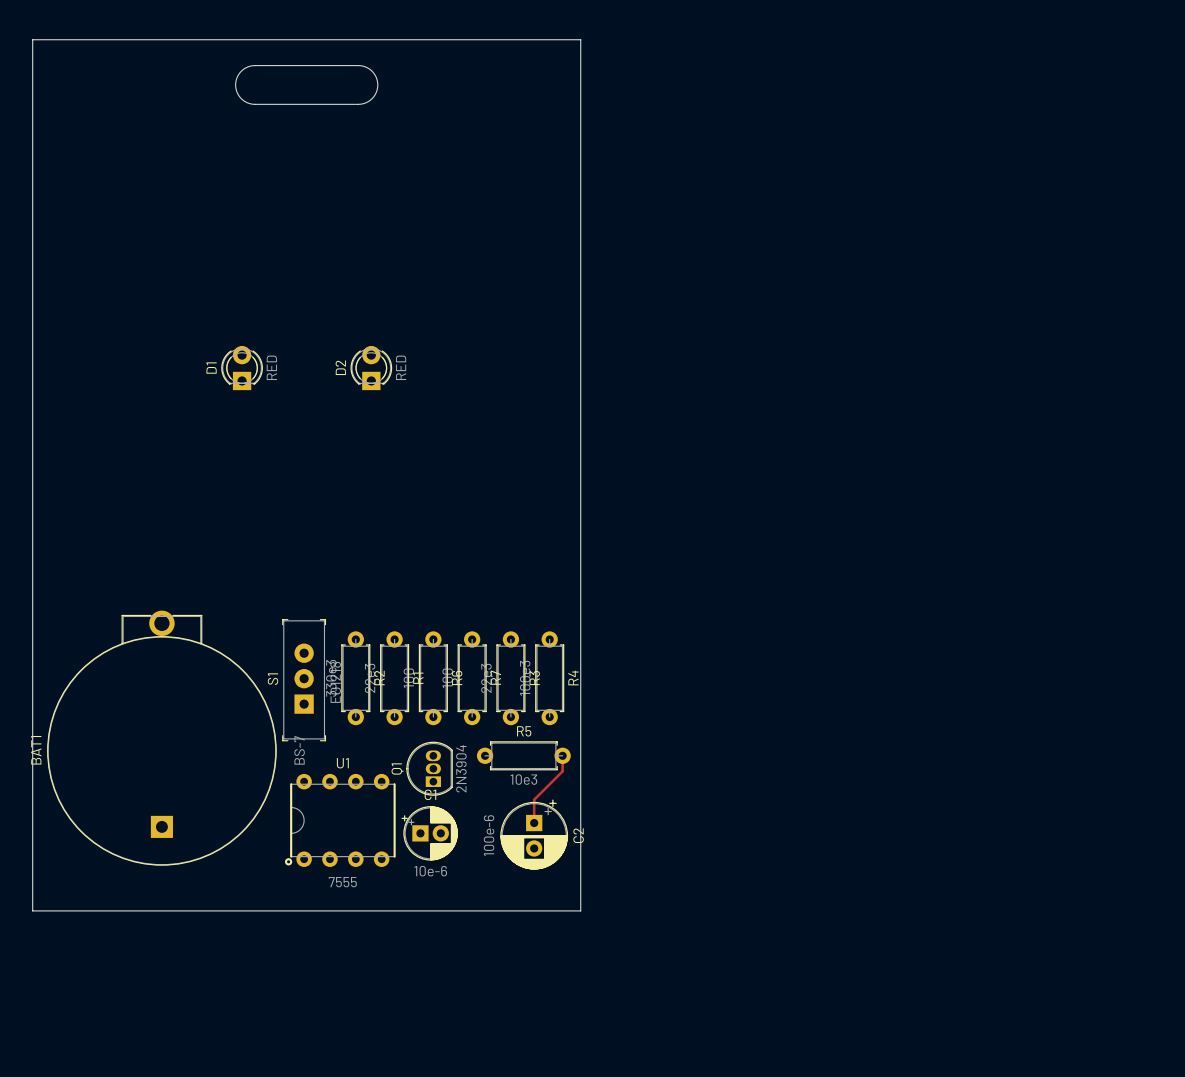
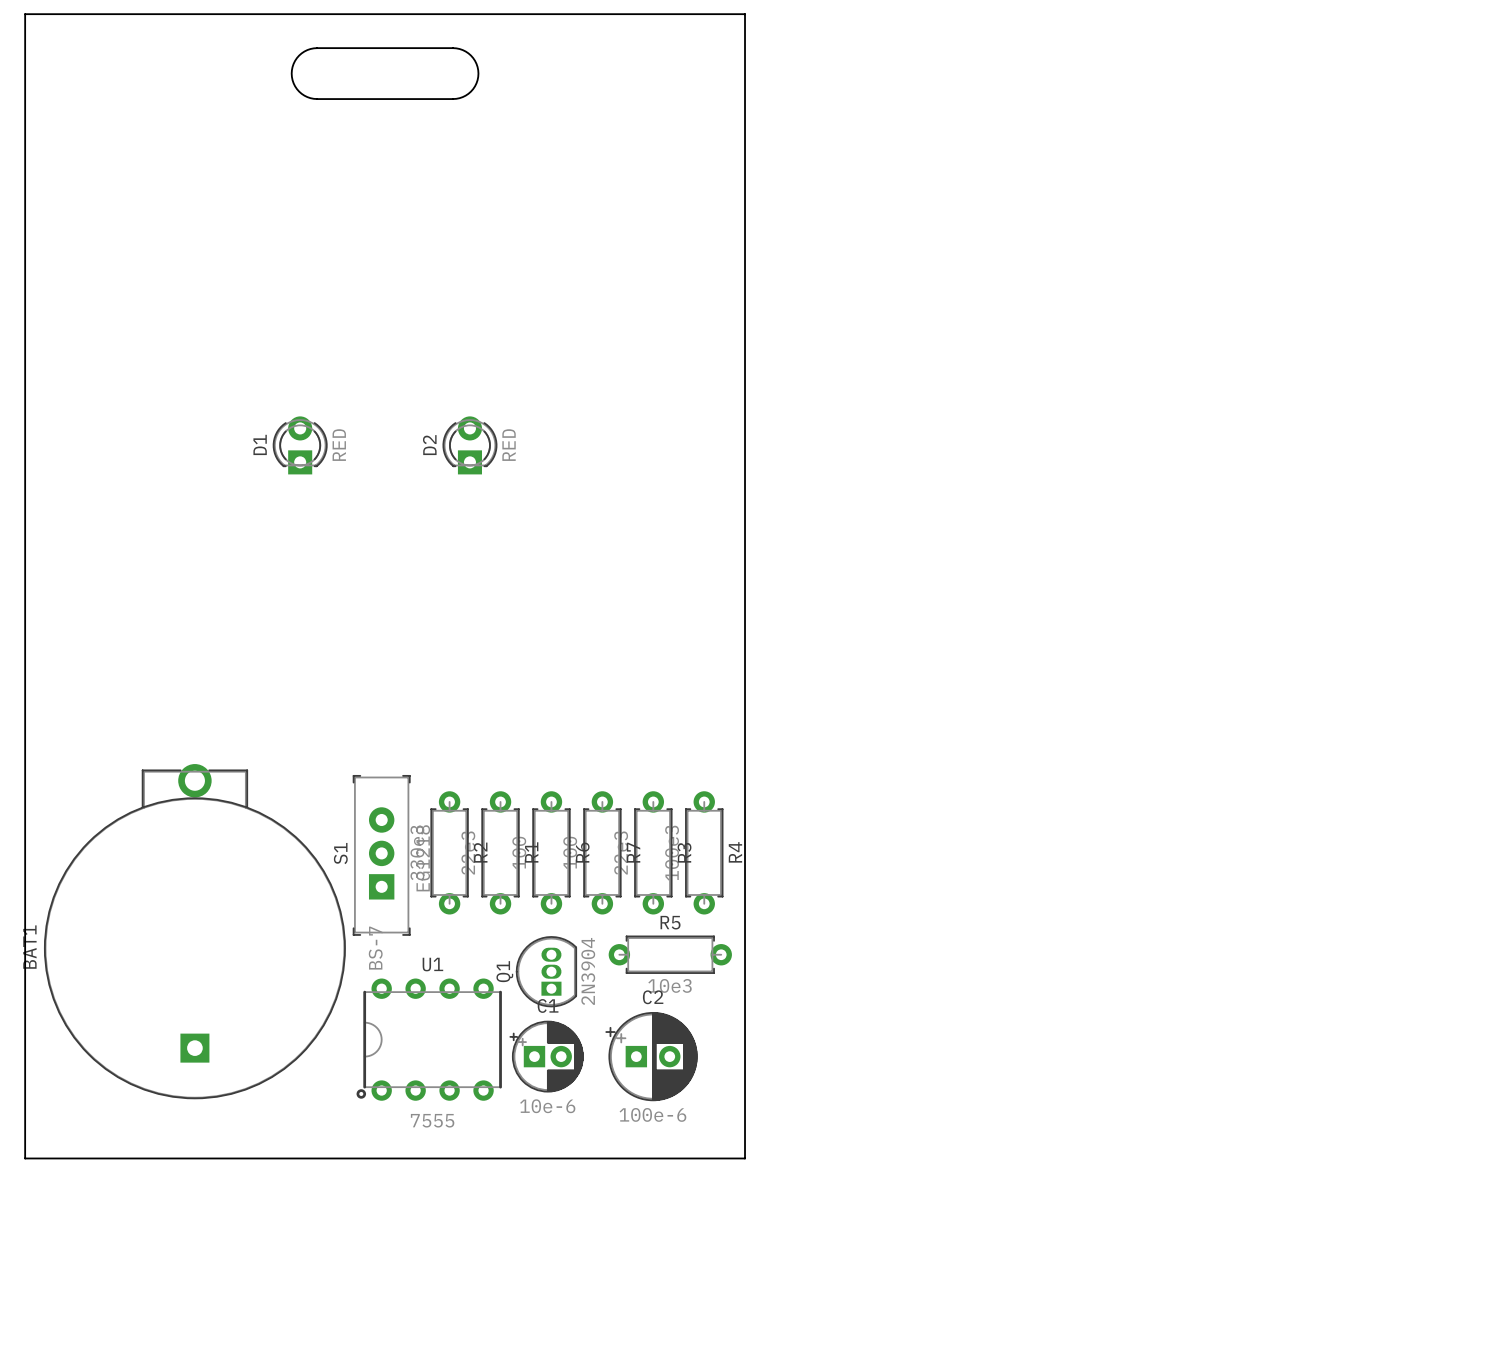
top track: (562, 755) (562, 771) (534, 799) (534, 823) -> none
C2 rotation: 0° (534, 834) -> 90° counterclockwise (651, 1056)

